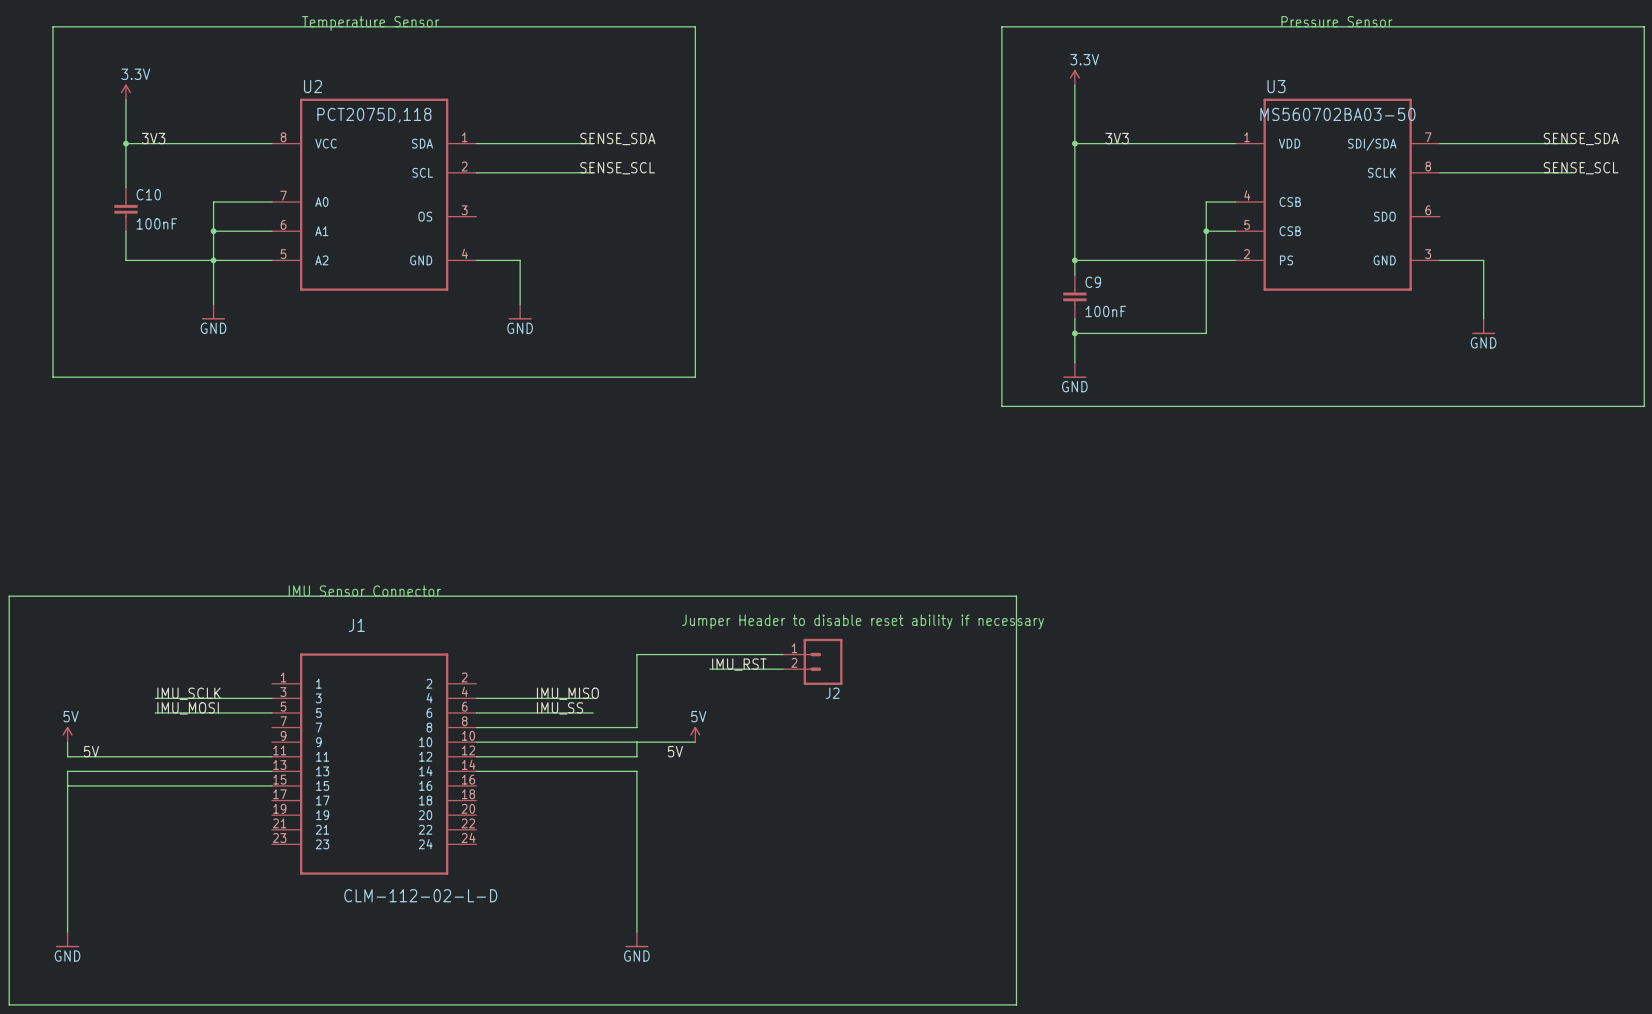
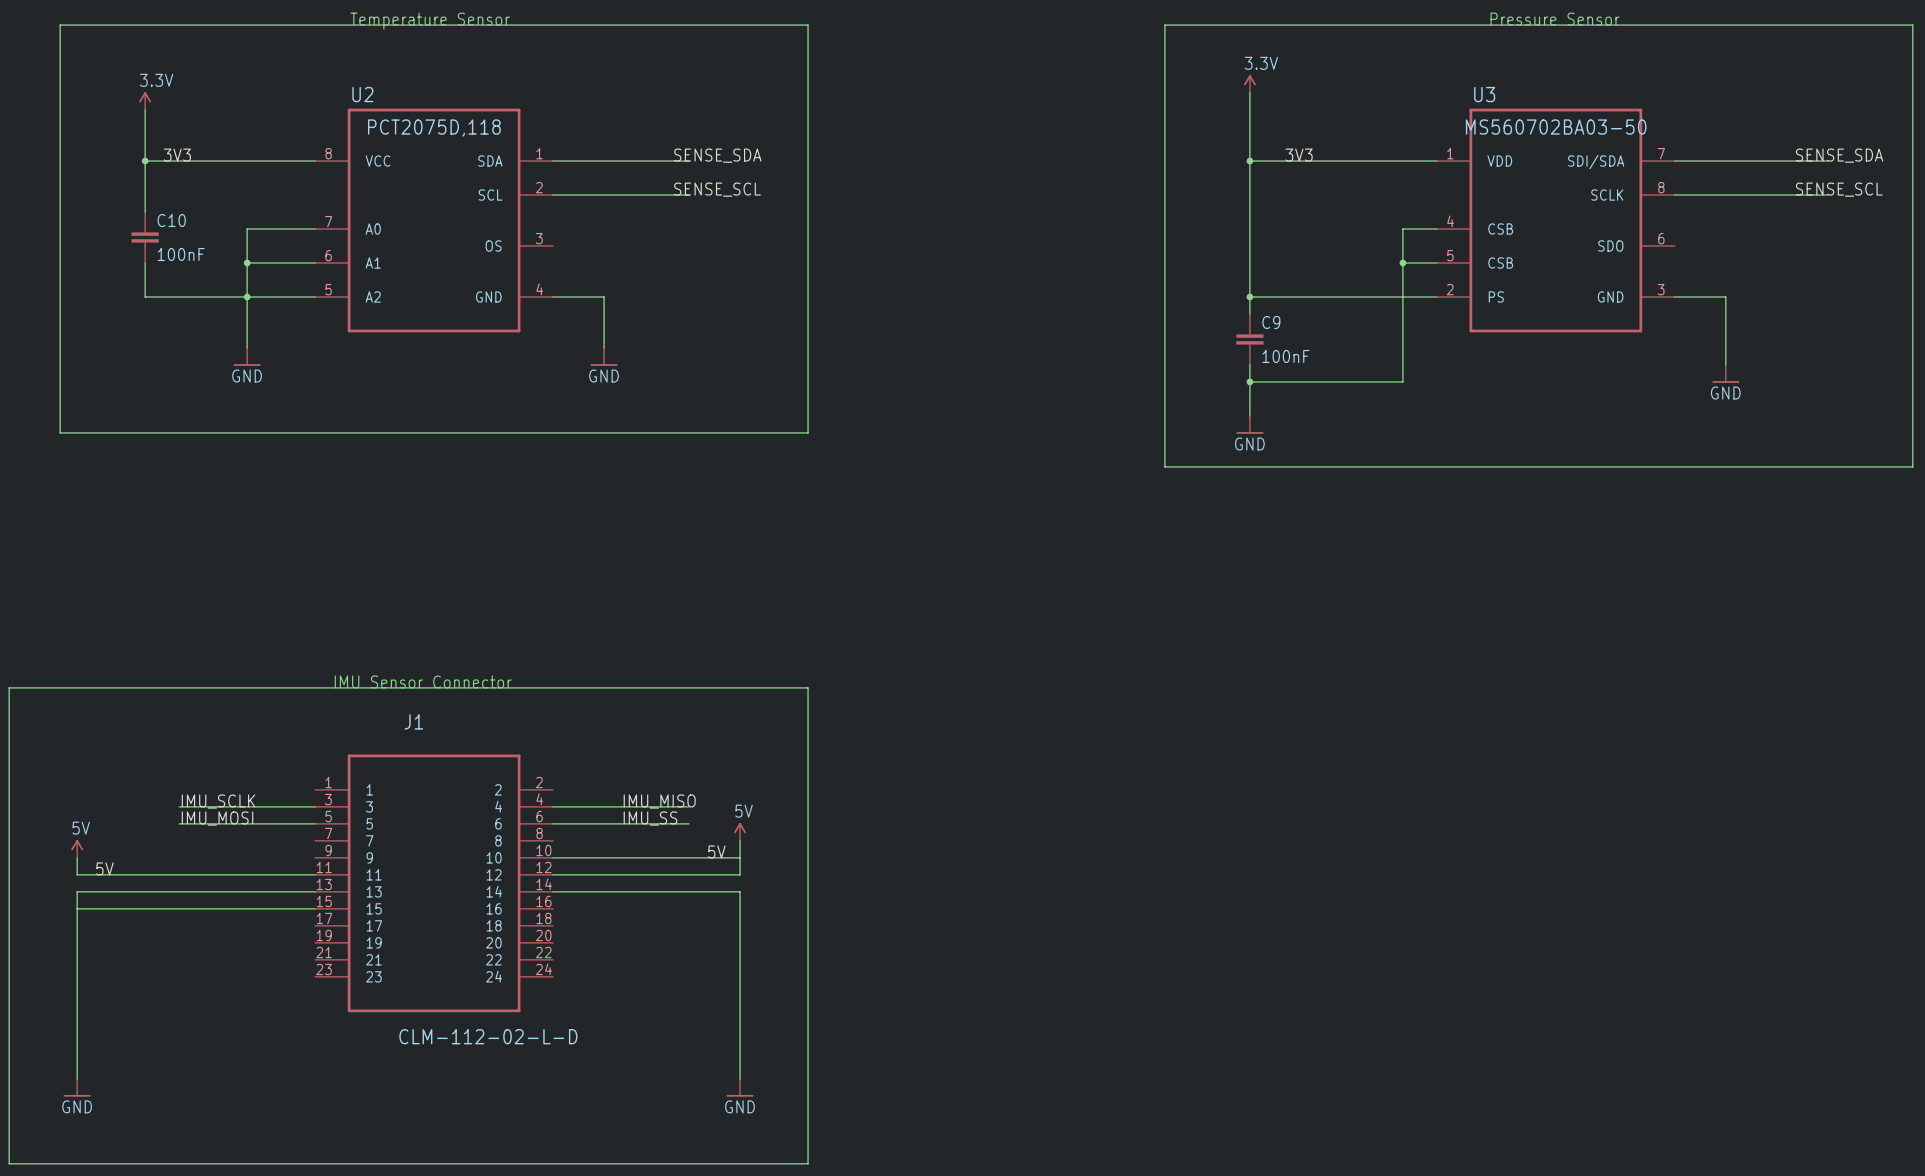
wire: (695, 596) (1016, 596) (1016, 1004) (695, 1004) -> (808, 687) (808, 1163)
text: Jumper Header to disable reset ability if necessary (863, 621) -> none
wire: (782, 654) (636, 654) (636, 727) (476, 727) -> none
J2: (812, 661) -> none
label: IMU_RST (739, 664) -> none
wire: (709, 669) (782, 669) -> none
power symbol position: 5V (695, 734) -> 5V (740, 831)
wire: (636, 742) (695, 742) -> (740, 857) (740, 840)
label position: 5V (675, 751) -> 5V (716, 851)

